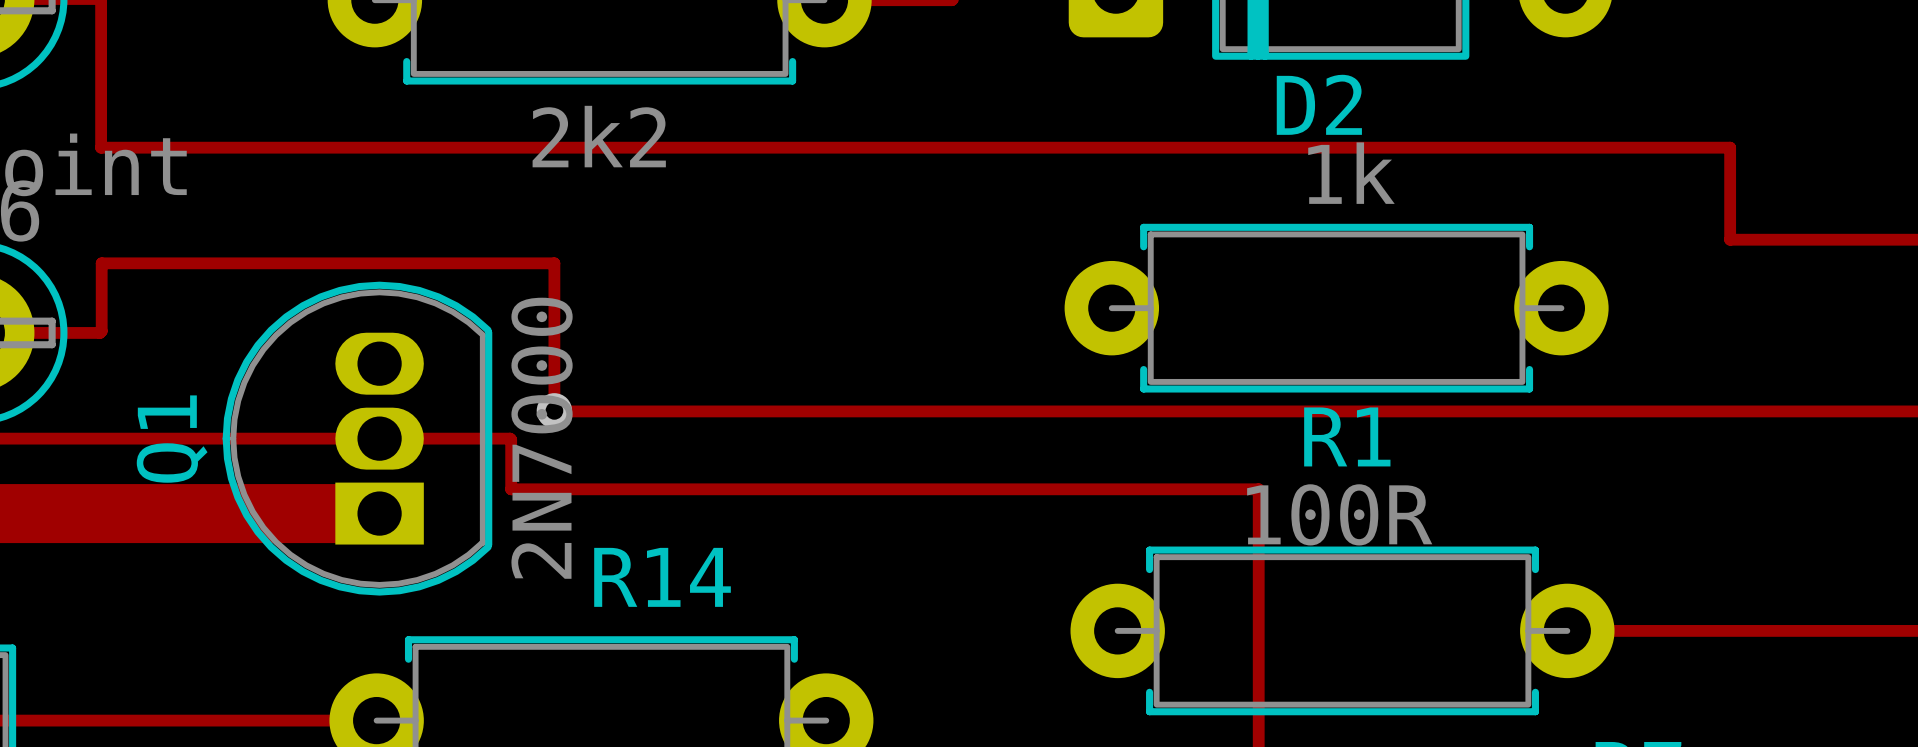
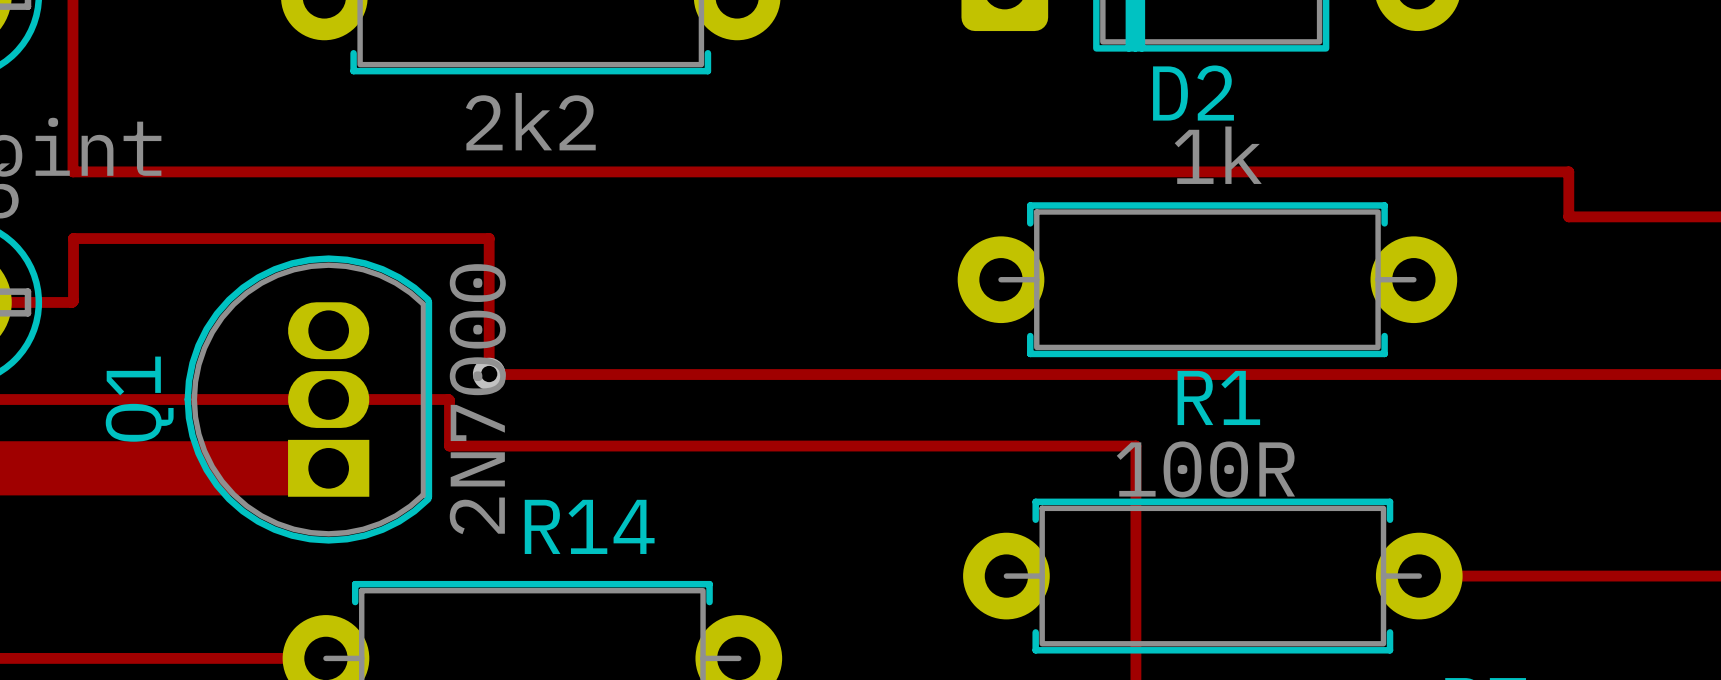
track: (101, 147) (1730, 147) (1730, 190) -> (72, 132) (72, 171) (1568, 171)

